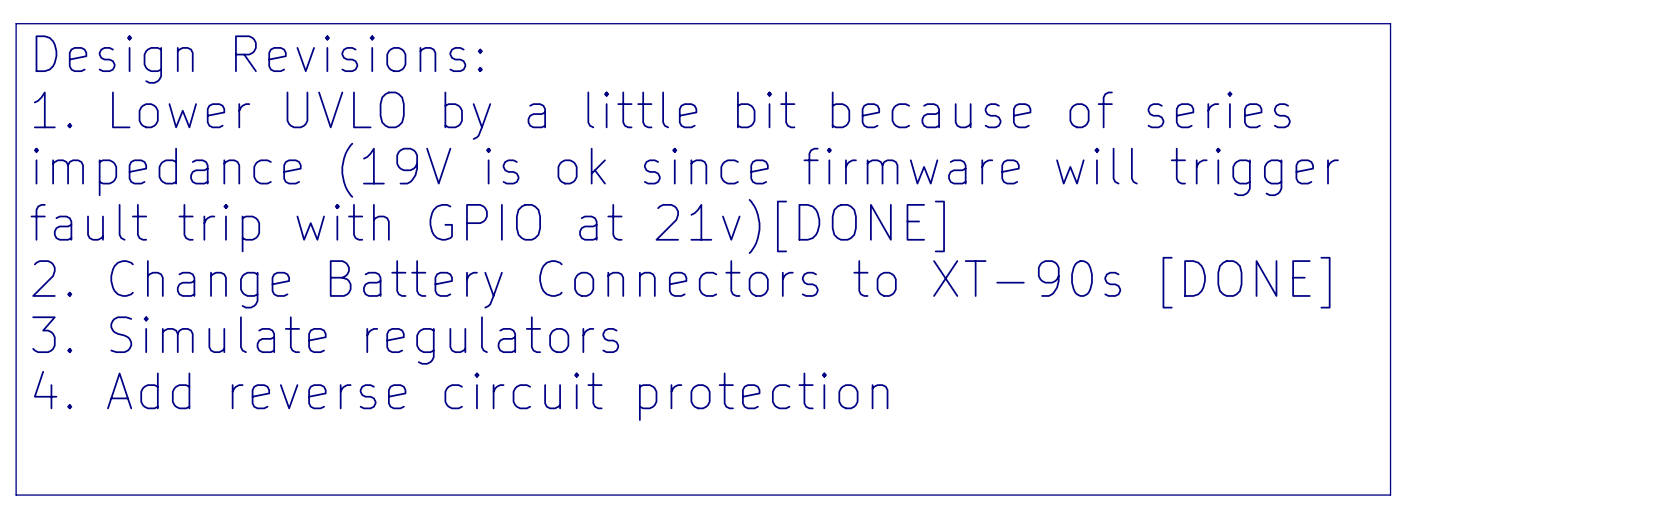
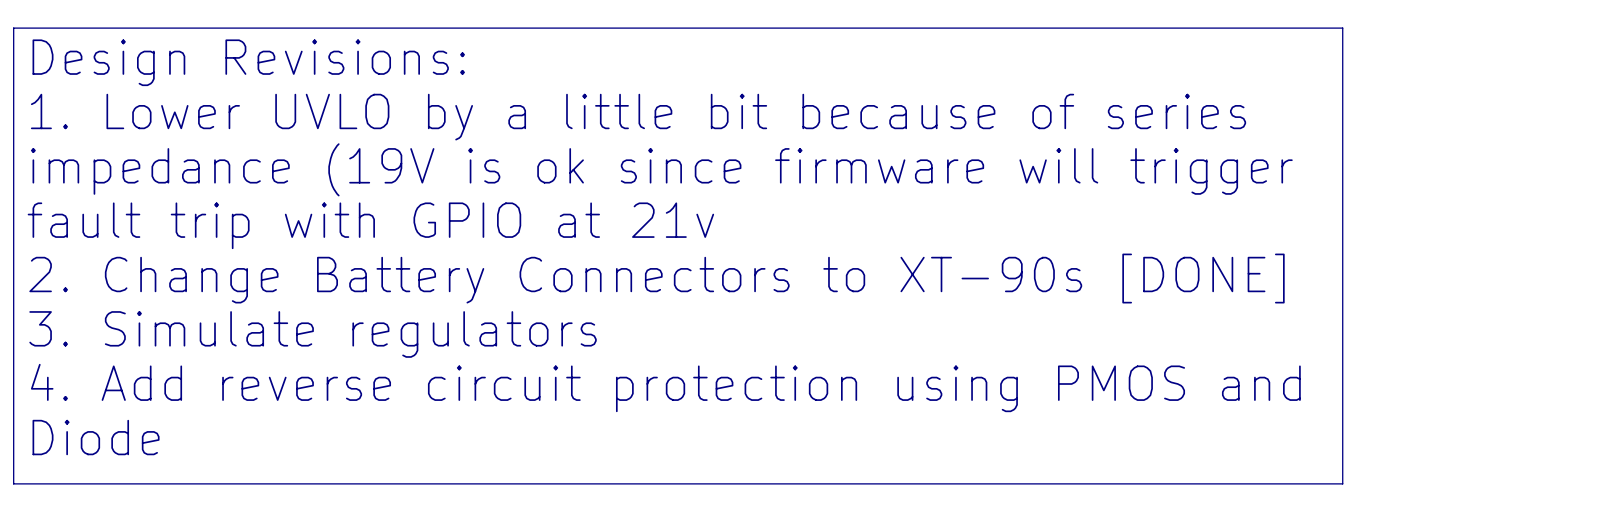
text: fault trip with GPIO at 21v)[DONE] (487, 226) -> fault trip with GPIO at 21v (370, 225)
text: 4. Add reverse circuit protection (461, 395) -> 4. Add reverse circuit protection using PMOS and (665, 388)
text: none -> Diode (96, 437)

